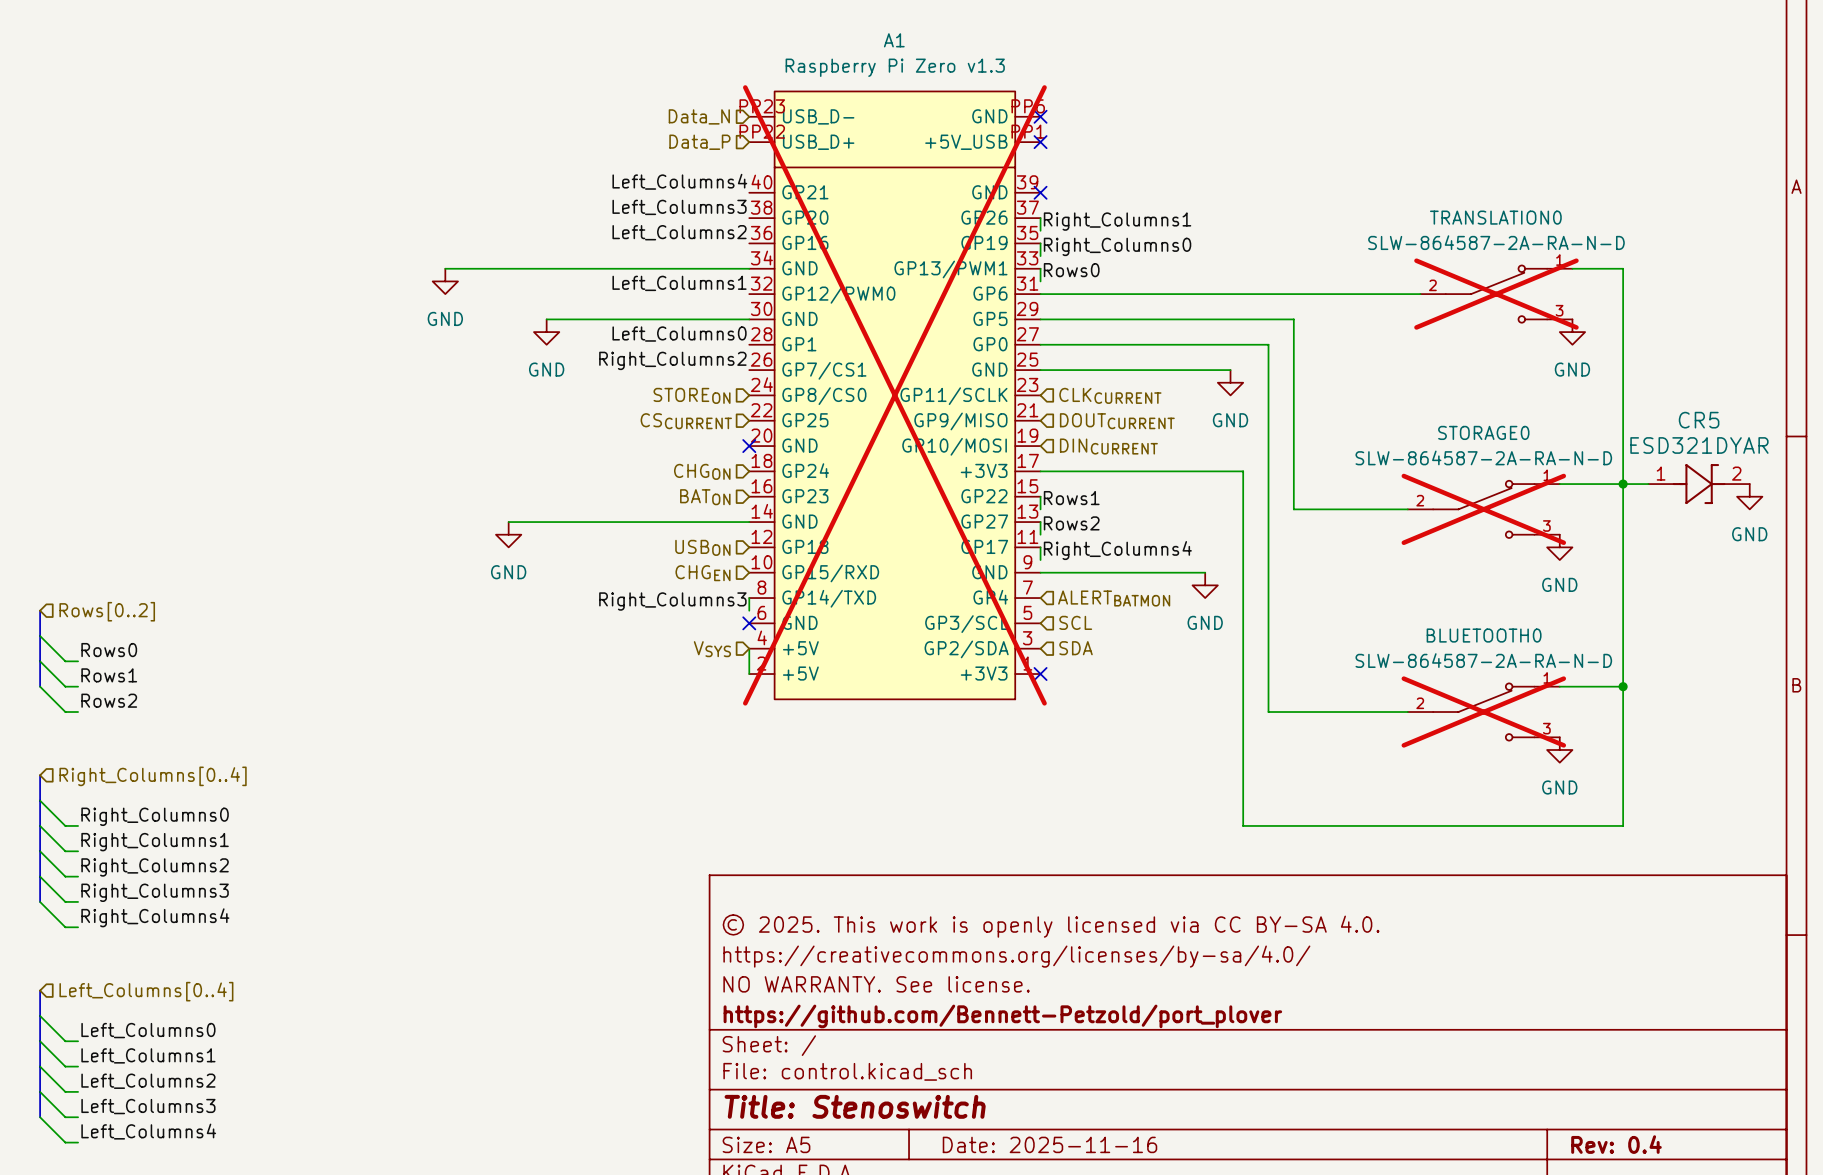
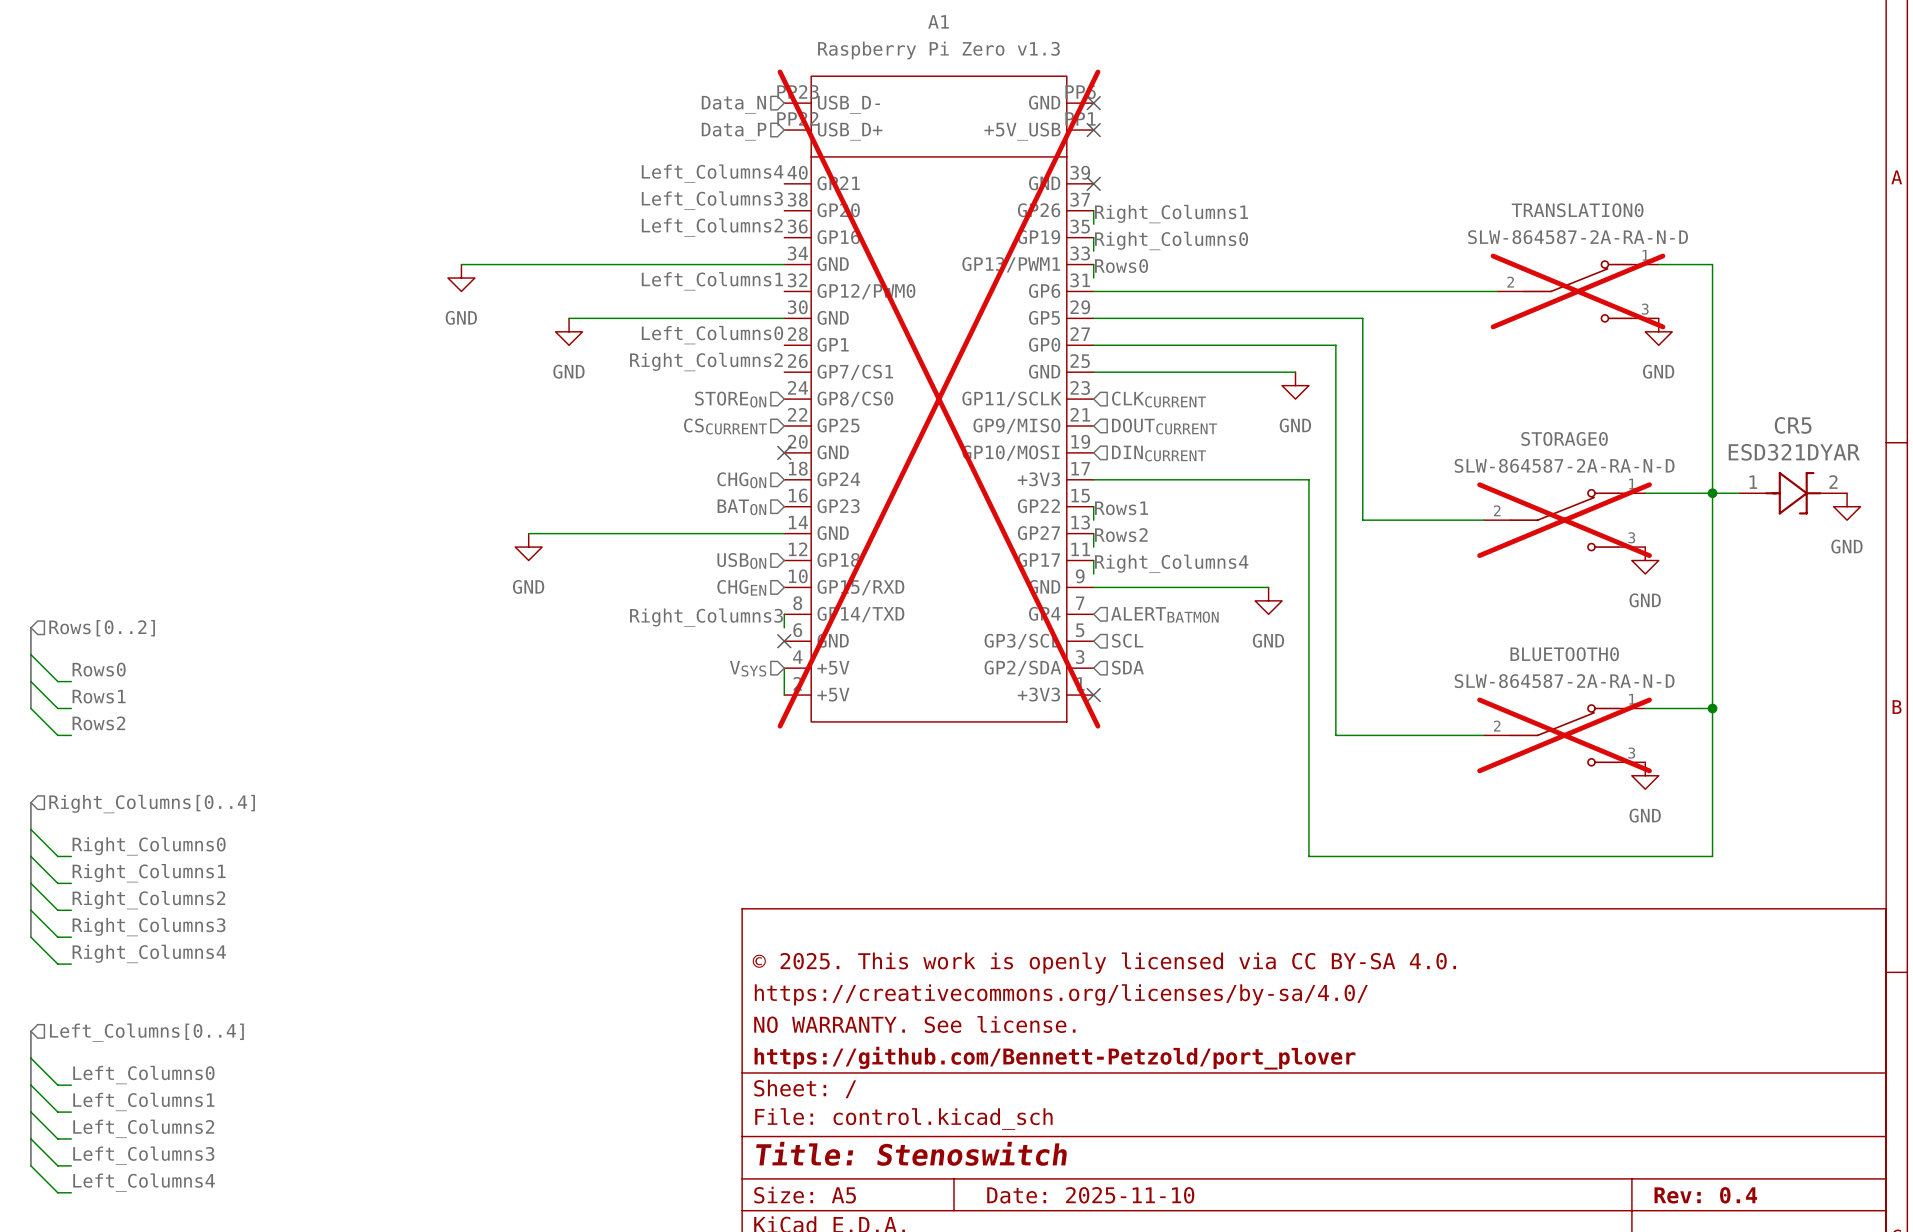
title block: Date: 2025-11-16 (1049, 1144) -> Date: 2025-11-10 (1090, 1195)

